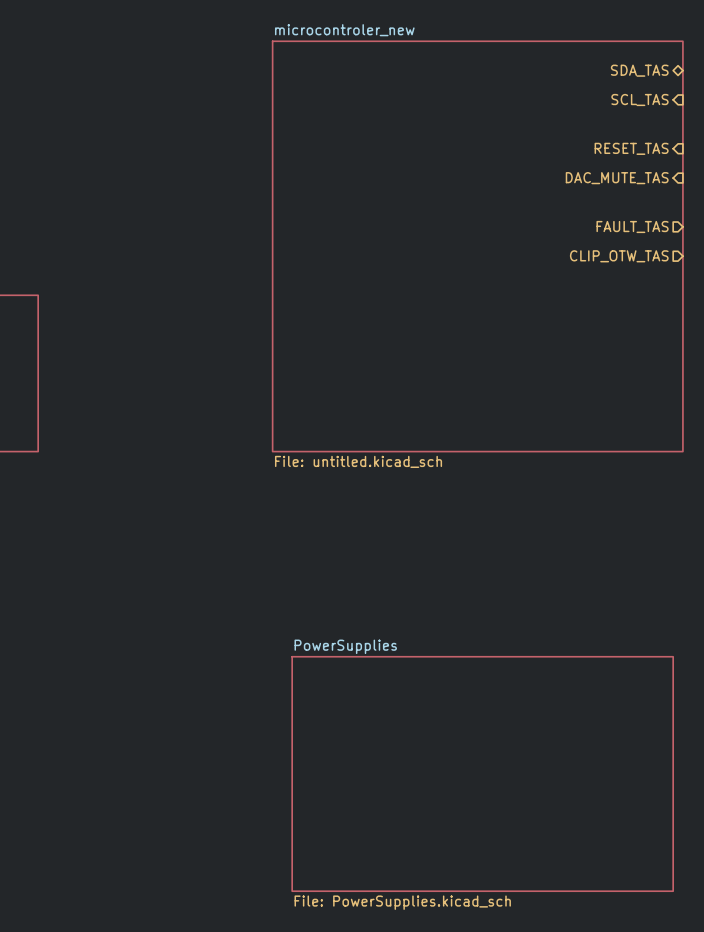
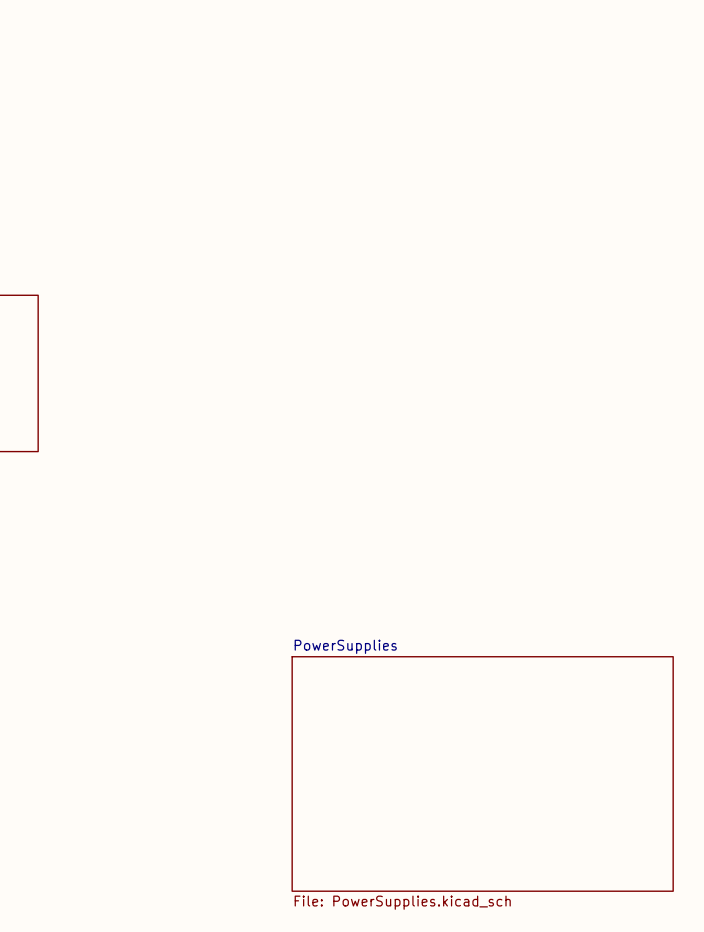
hierarchical label: SDA_TAS (639, 70) -> none
hierarchical label: SCL_TAS (639, 99) -> none
hierarchical label: RESET_TAS (631, 148) -> none
hierarchical label: DAC_MUTE_TAS (617, 178) -> none
hierarchical label: FAULT_TAS (632, 226) -> none
sheet microcontroler_new: File: untitled.kicad_sch (477, 246) -> none
hierarchical label: CLIP_OTW_TAS (619, 256) -> none

